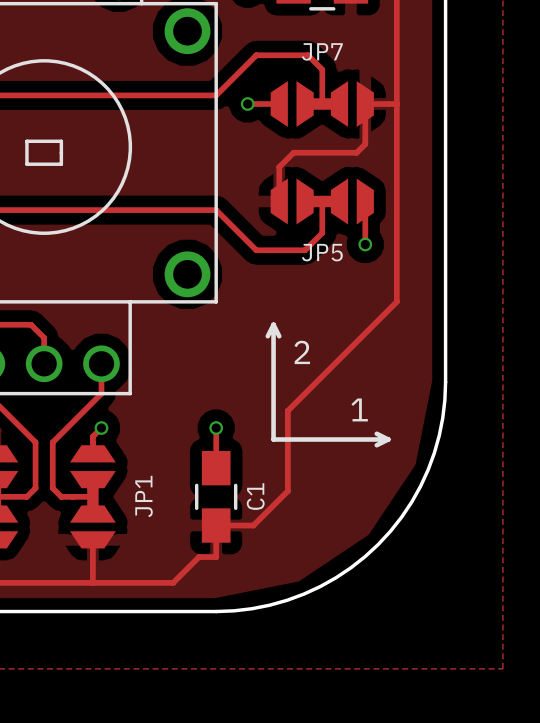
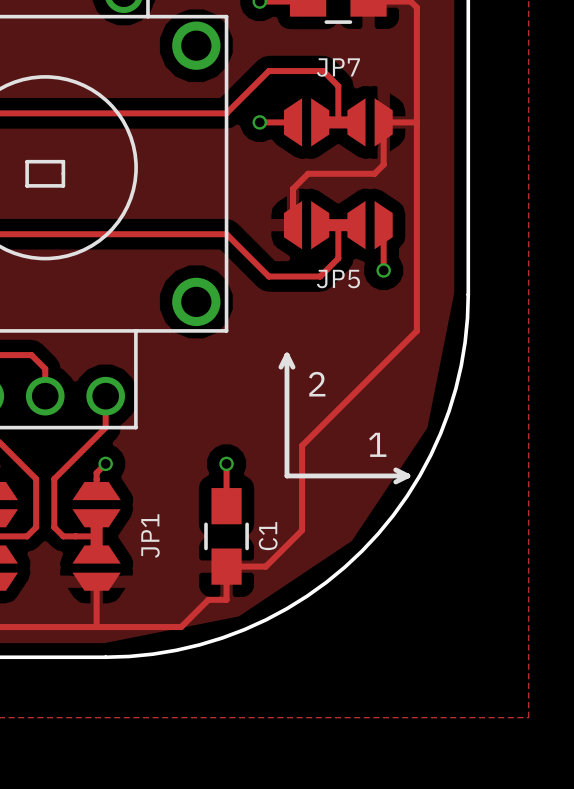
board edge: (445, 267) (445, 382) (439, 435) (428, 469) (411, 502) (378, 544) (351, 567) (320, 586) (269, 605) (216, 611) (101, 611) -> (468, 294) (467, 318) (461, 365) (449, 411) (440, 433) (430, 455) (407, 496) (378, 533) (362, 551) (326, 582) (307, 596) (286, 608) (244, 629) (222, 638) (176, 650) (153, 654) (105, 657)

